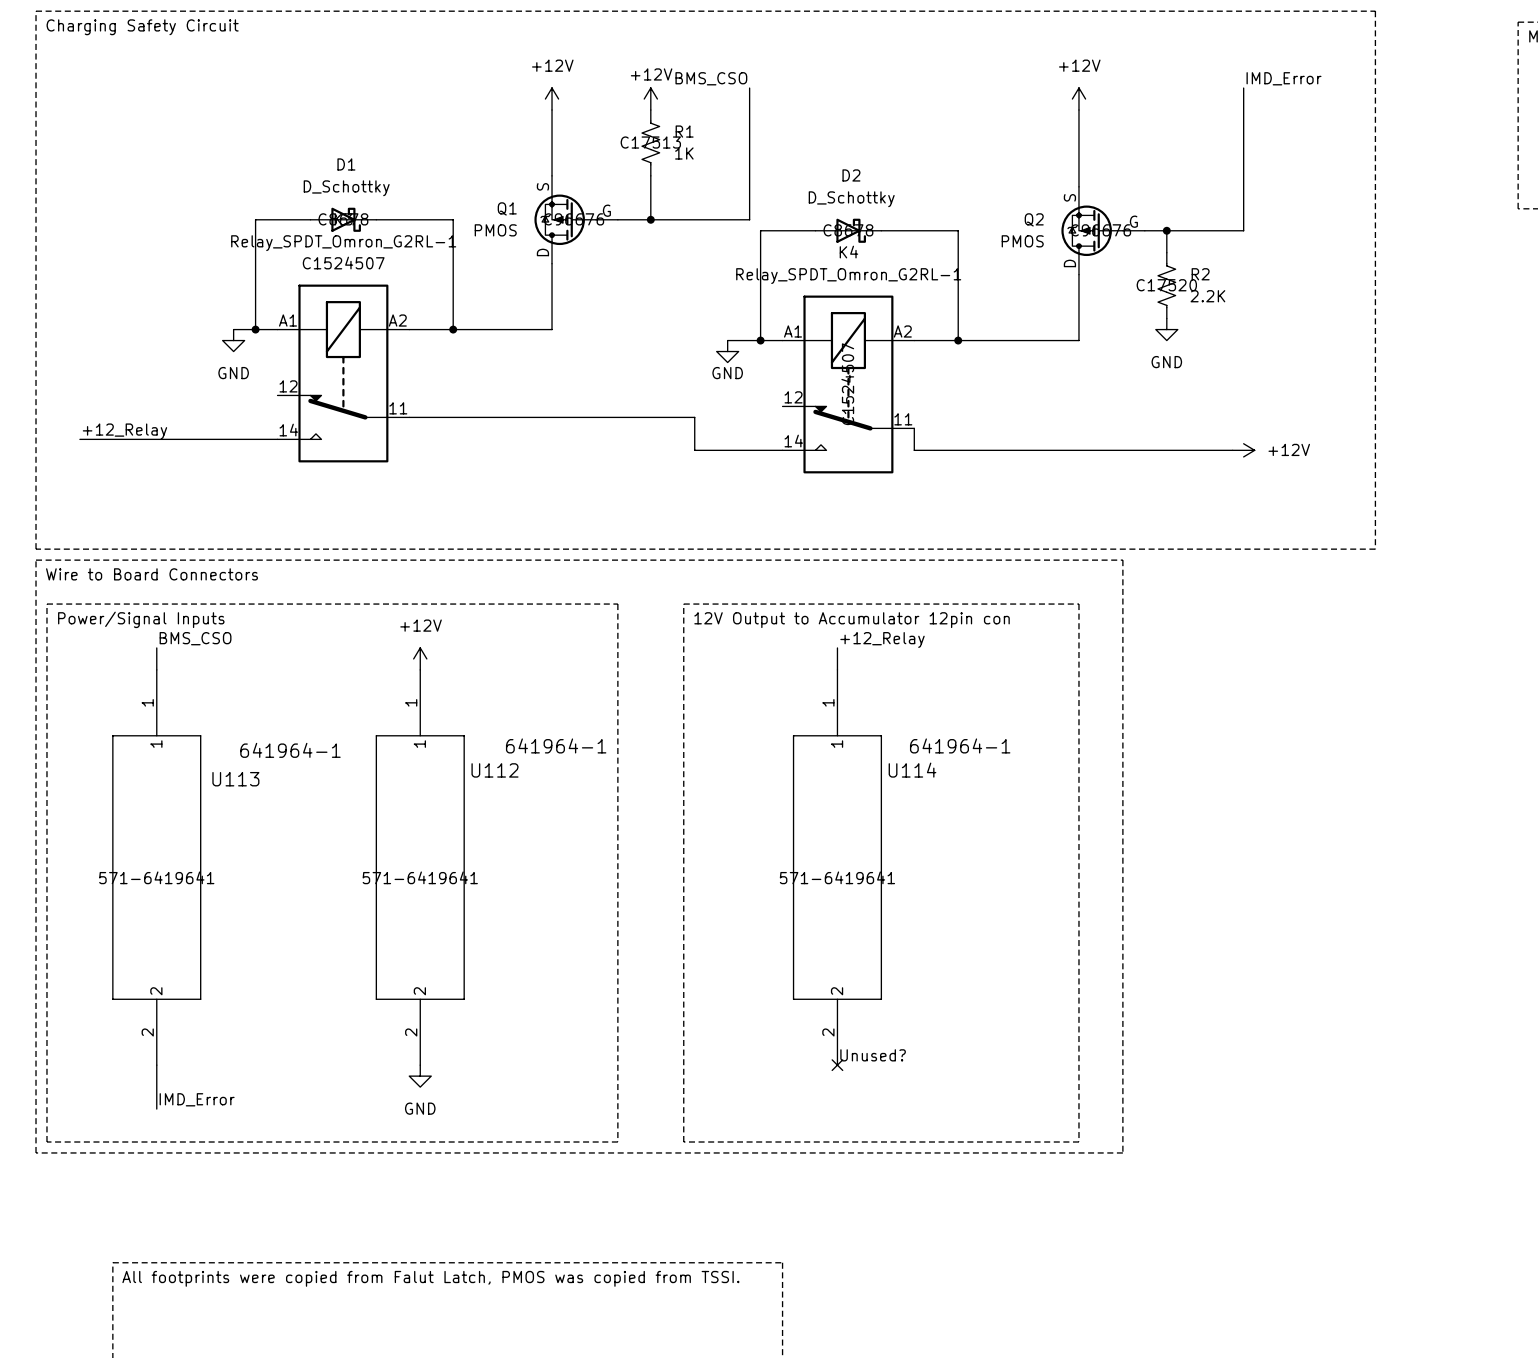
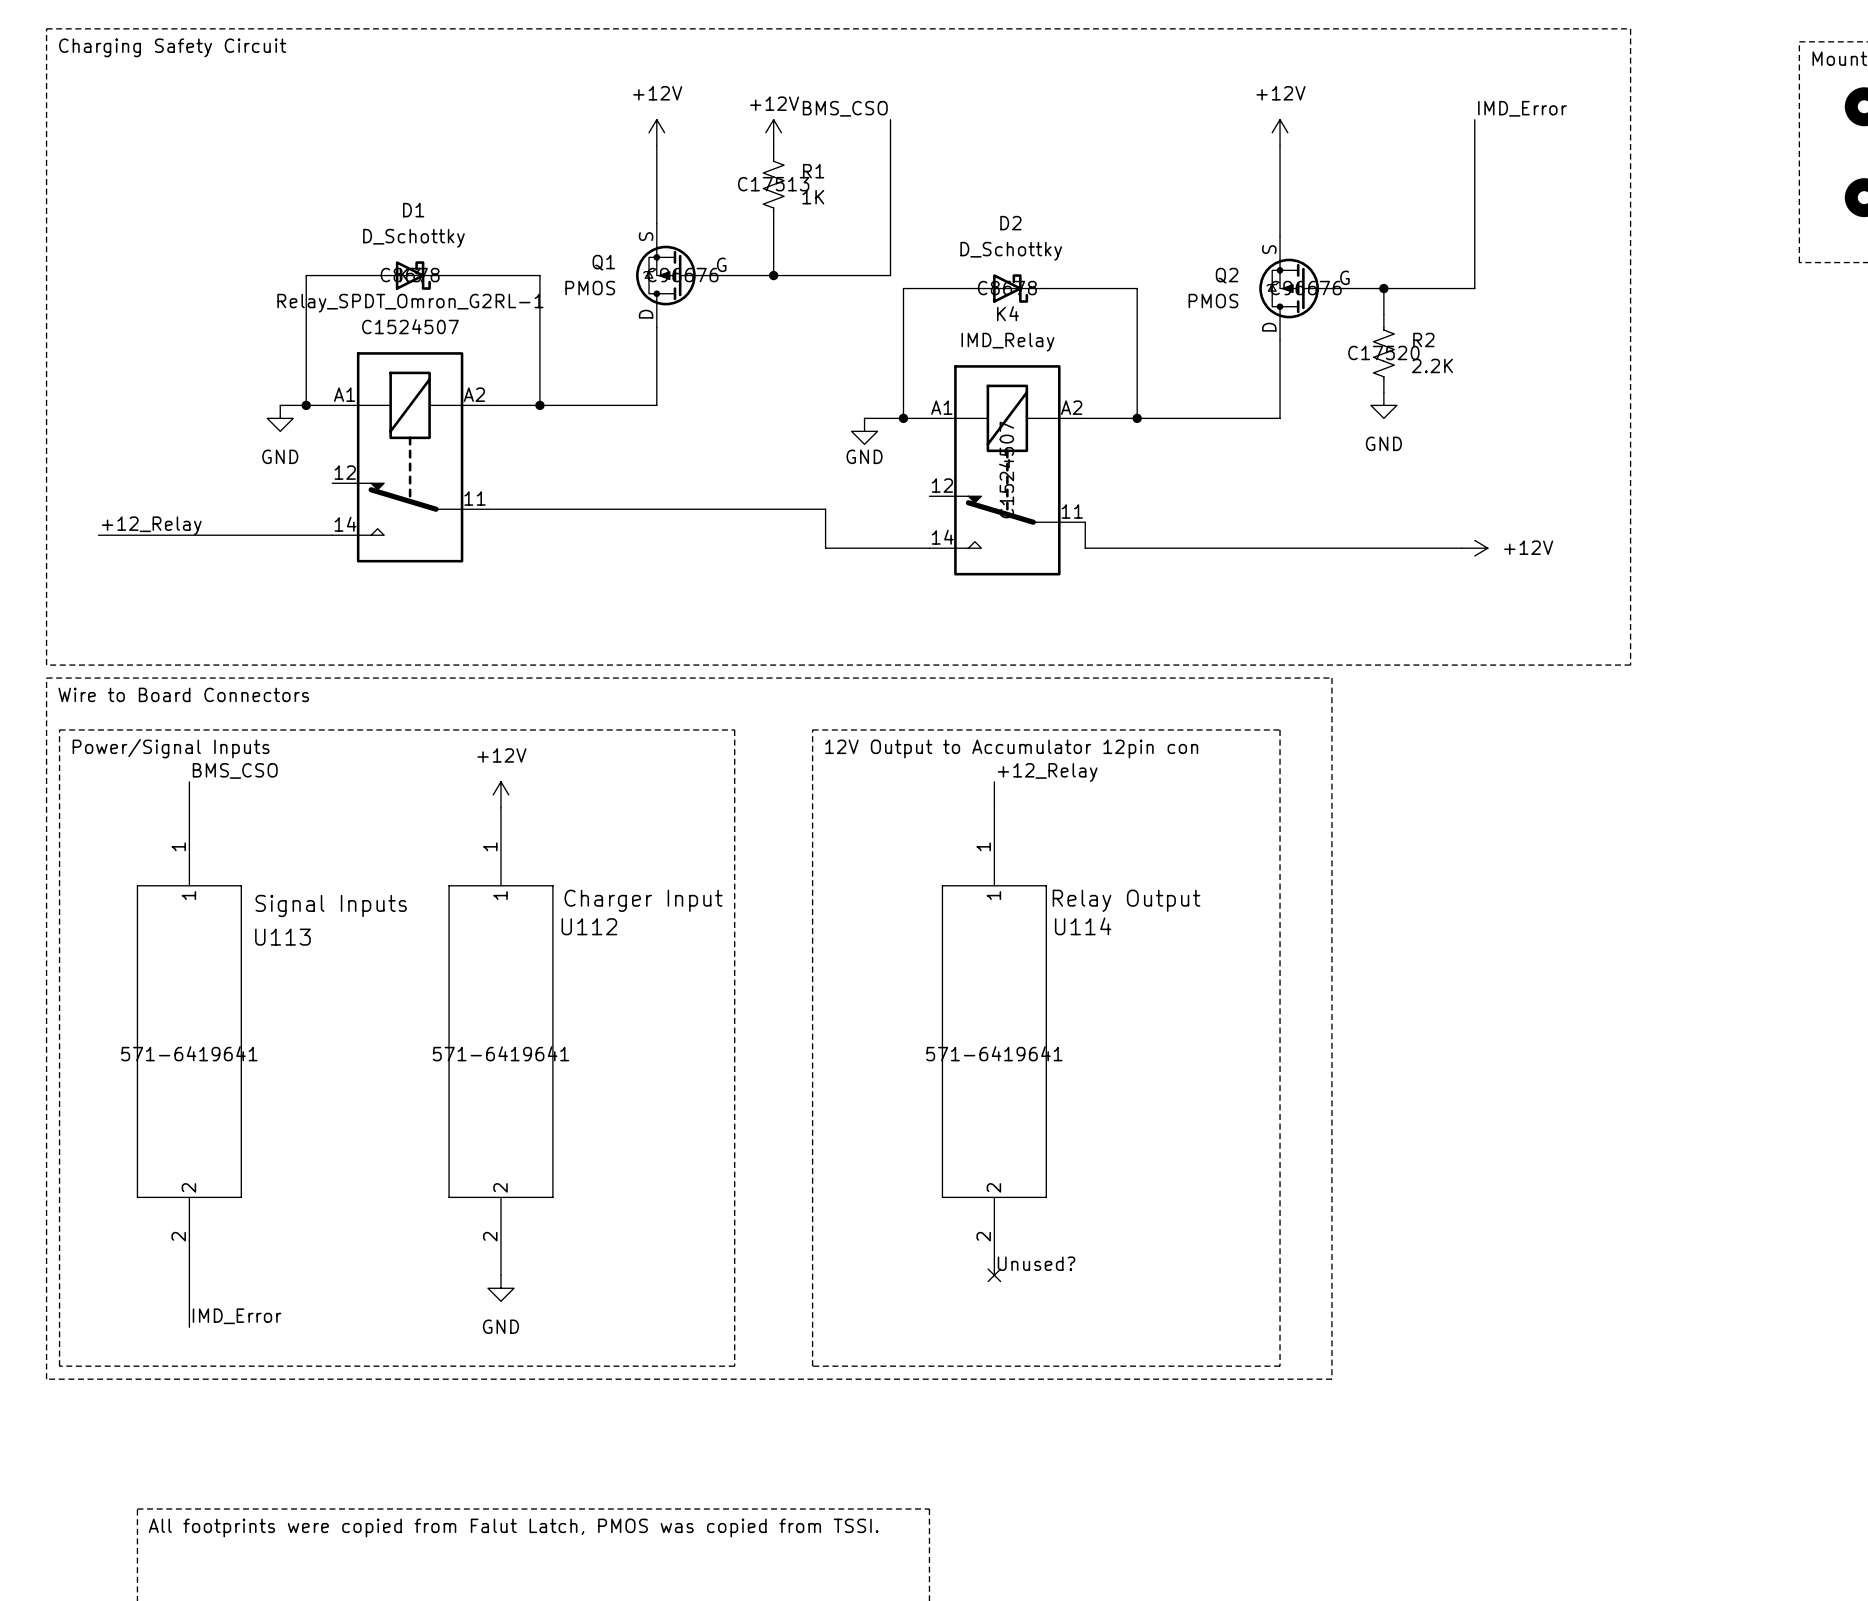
K4 value: Relay_SPDT_Omron_G2RL-1 (848, 276) -> IMD_Relay (1007, 342)
U112 value: 641964-1 (556, 745) -> Charger Input (643, 900)
U114 value: 641964-1 (960, 745) -> Relay Output (1126, 900)
U113 value: 641964-1 (290, 750) -> Signal Inputs (331, 905)

